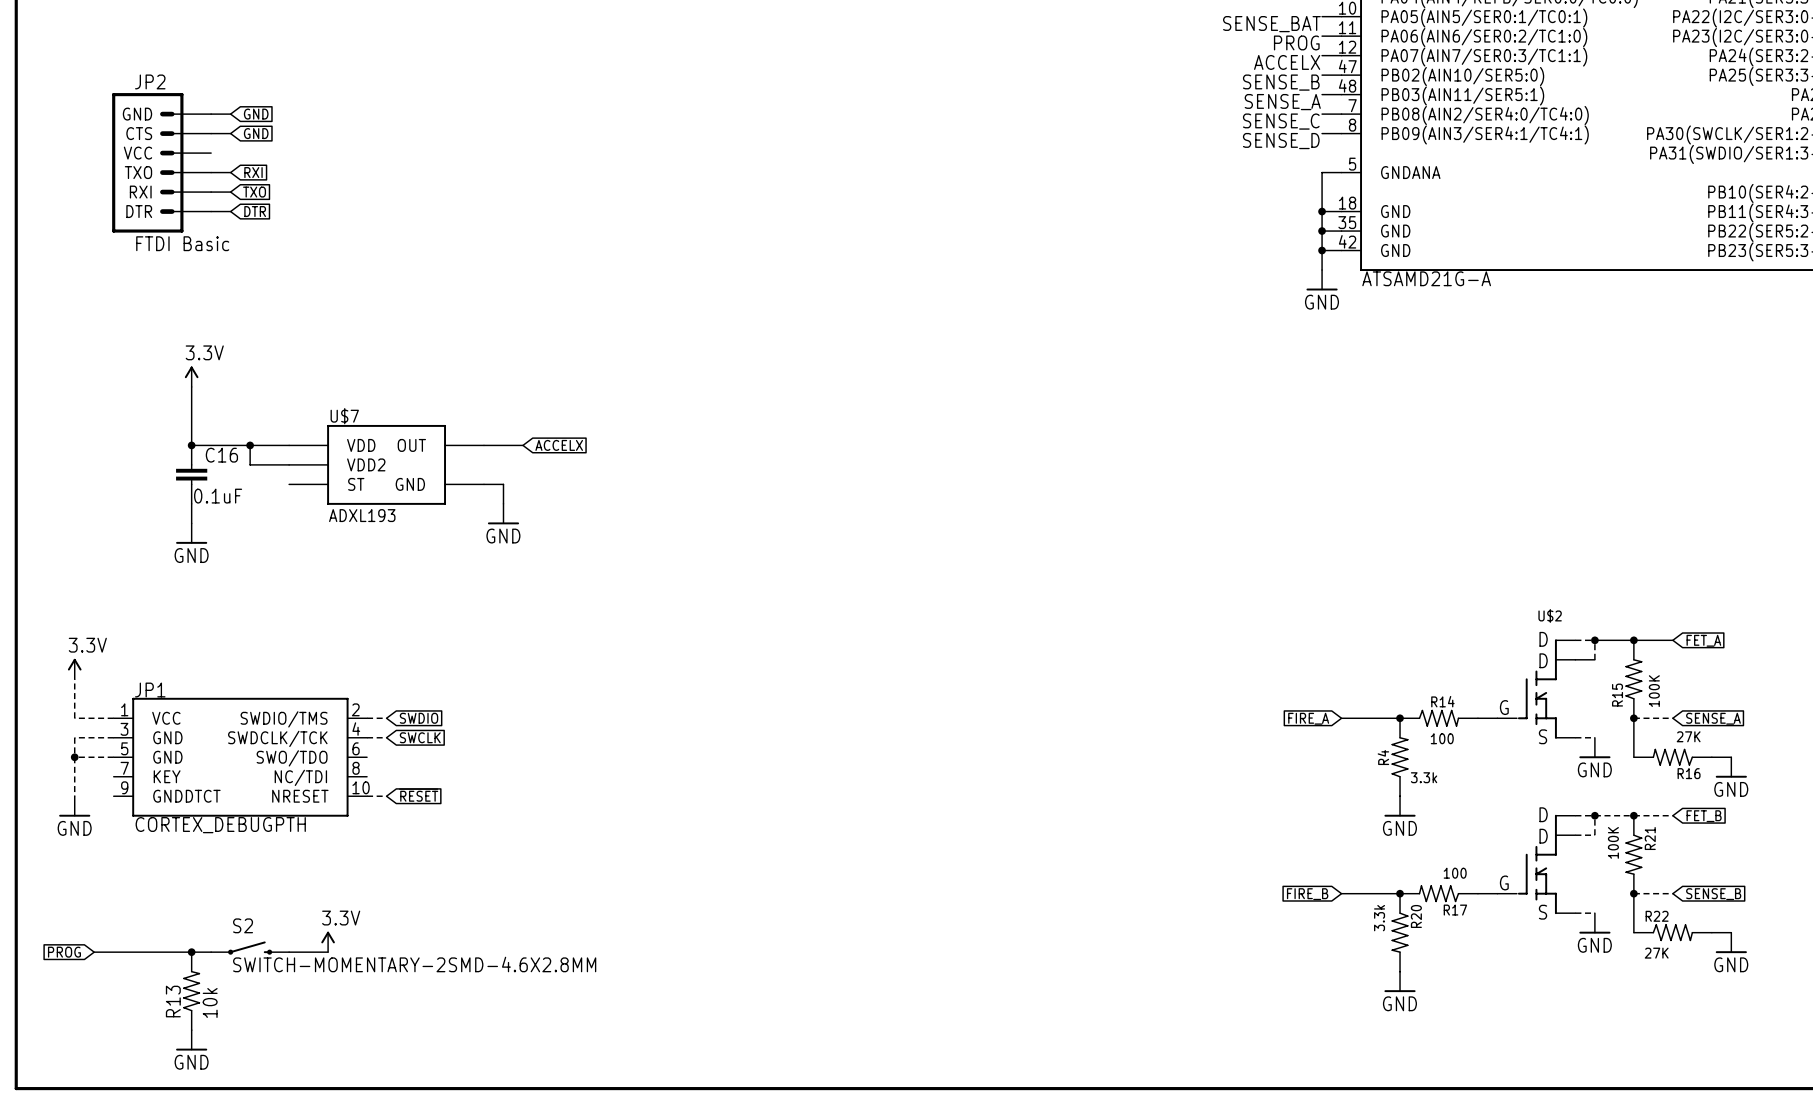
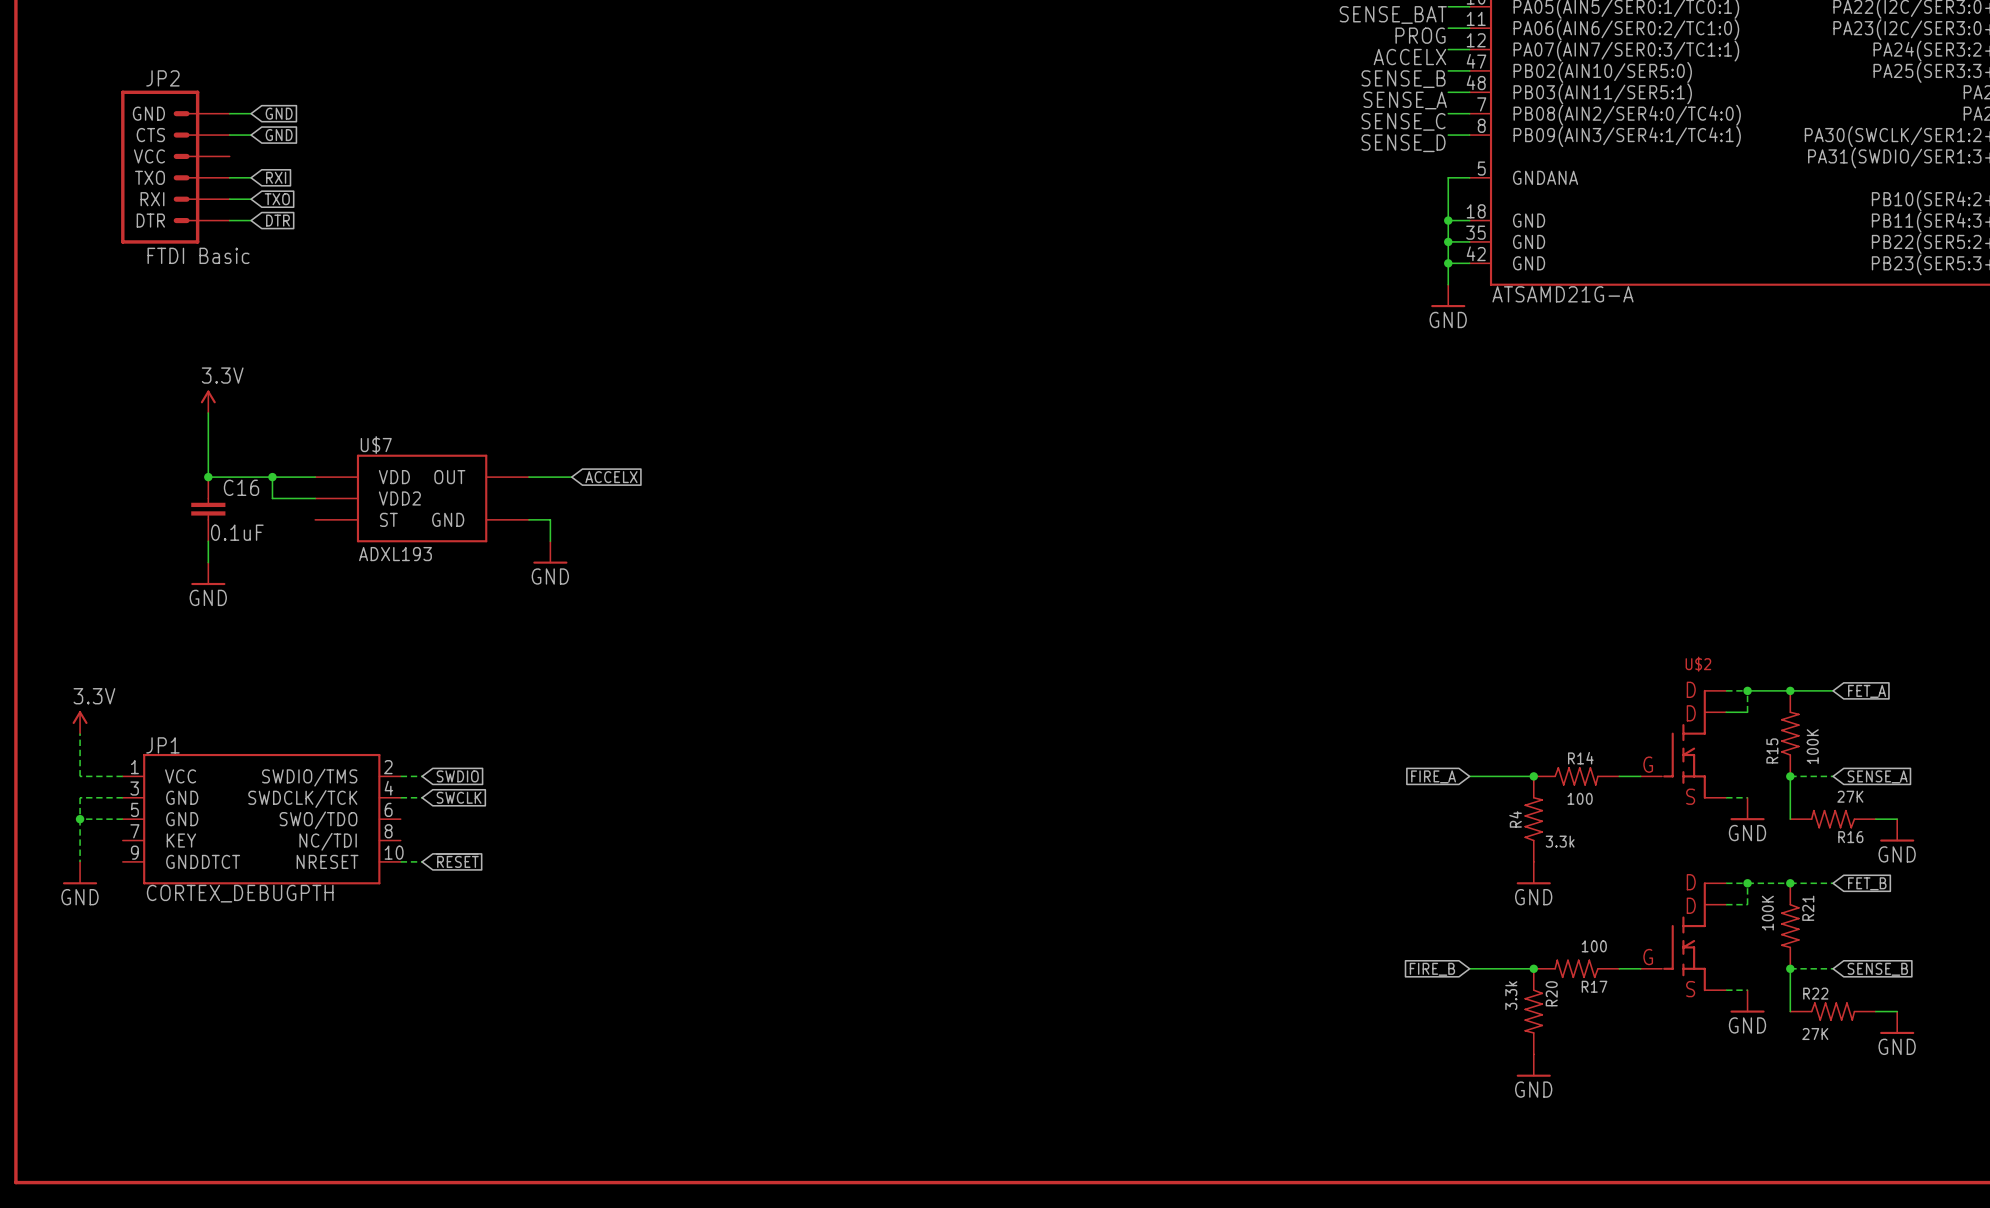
power symbol: 3.3V (328, 941) -> none
S2: SWITCH-MOMENTARY-2SMD-4.6X2.8MM (250, 948) -> none
global label: PROG (64, 952) -> none
wire: (94, 952) (211, 952) -> none
junction: (191, 952) -> none
wire: (289, 952) (328, 952) -> none
R13: 10k (191, 991) -> none
power symbol: GND (191, 1040) -> none

